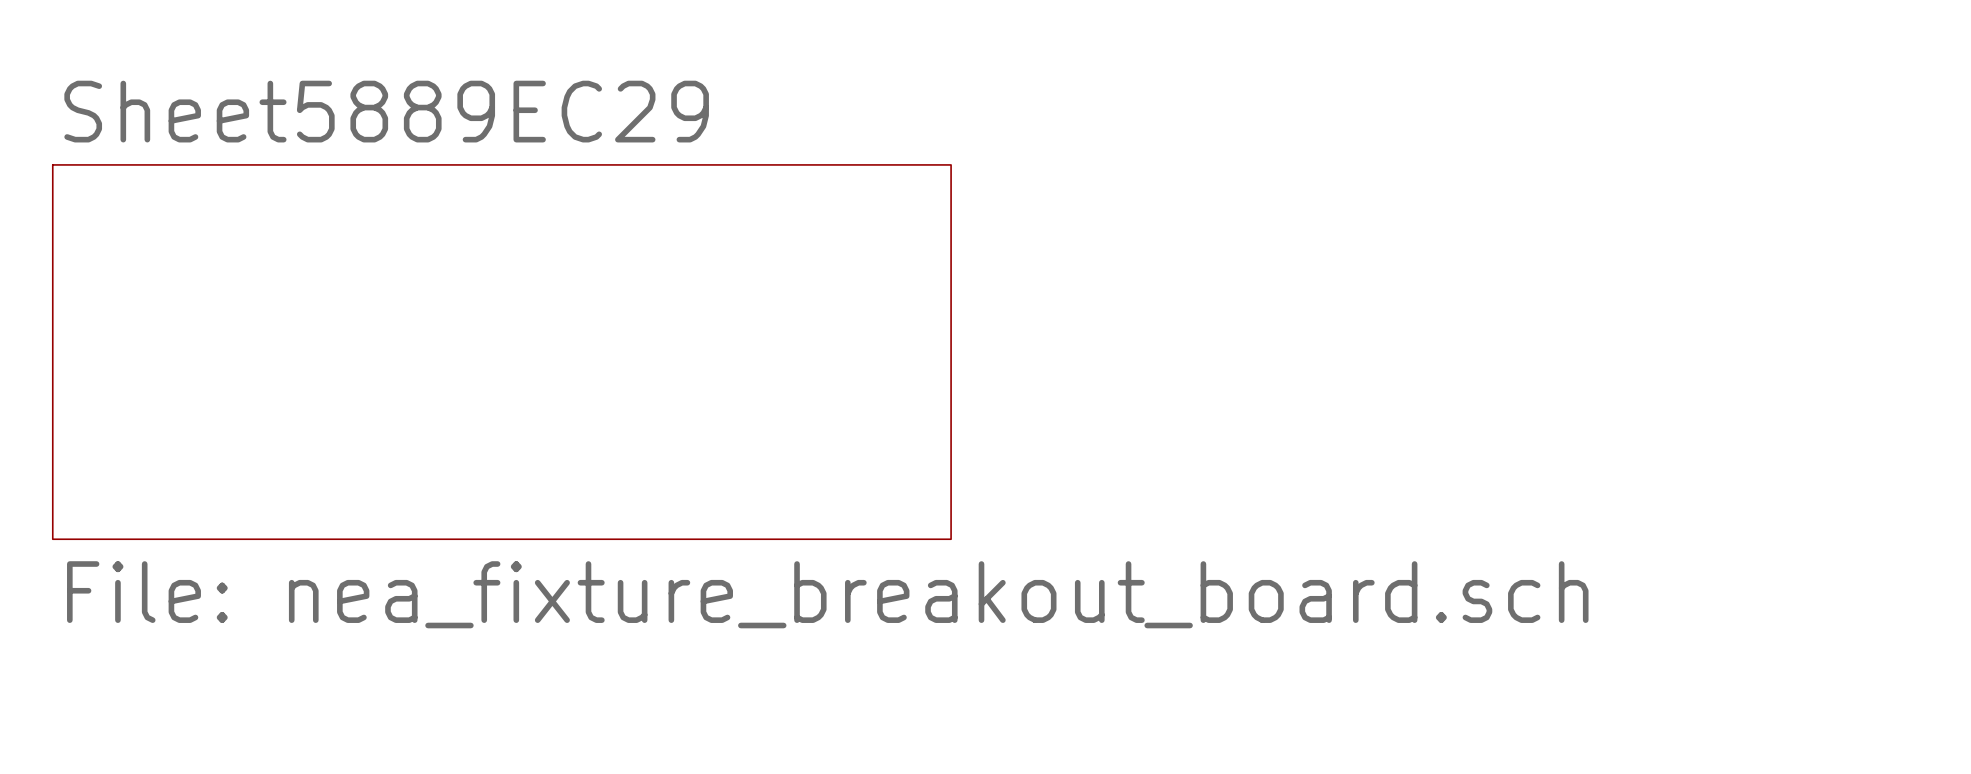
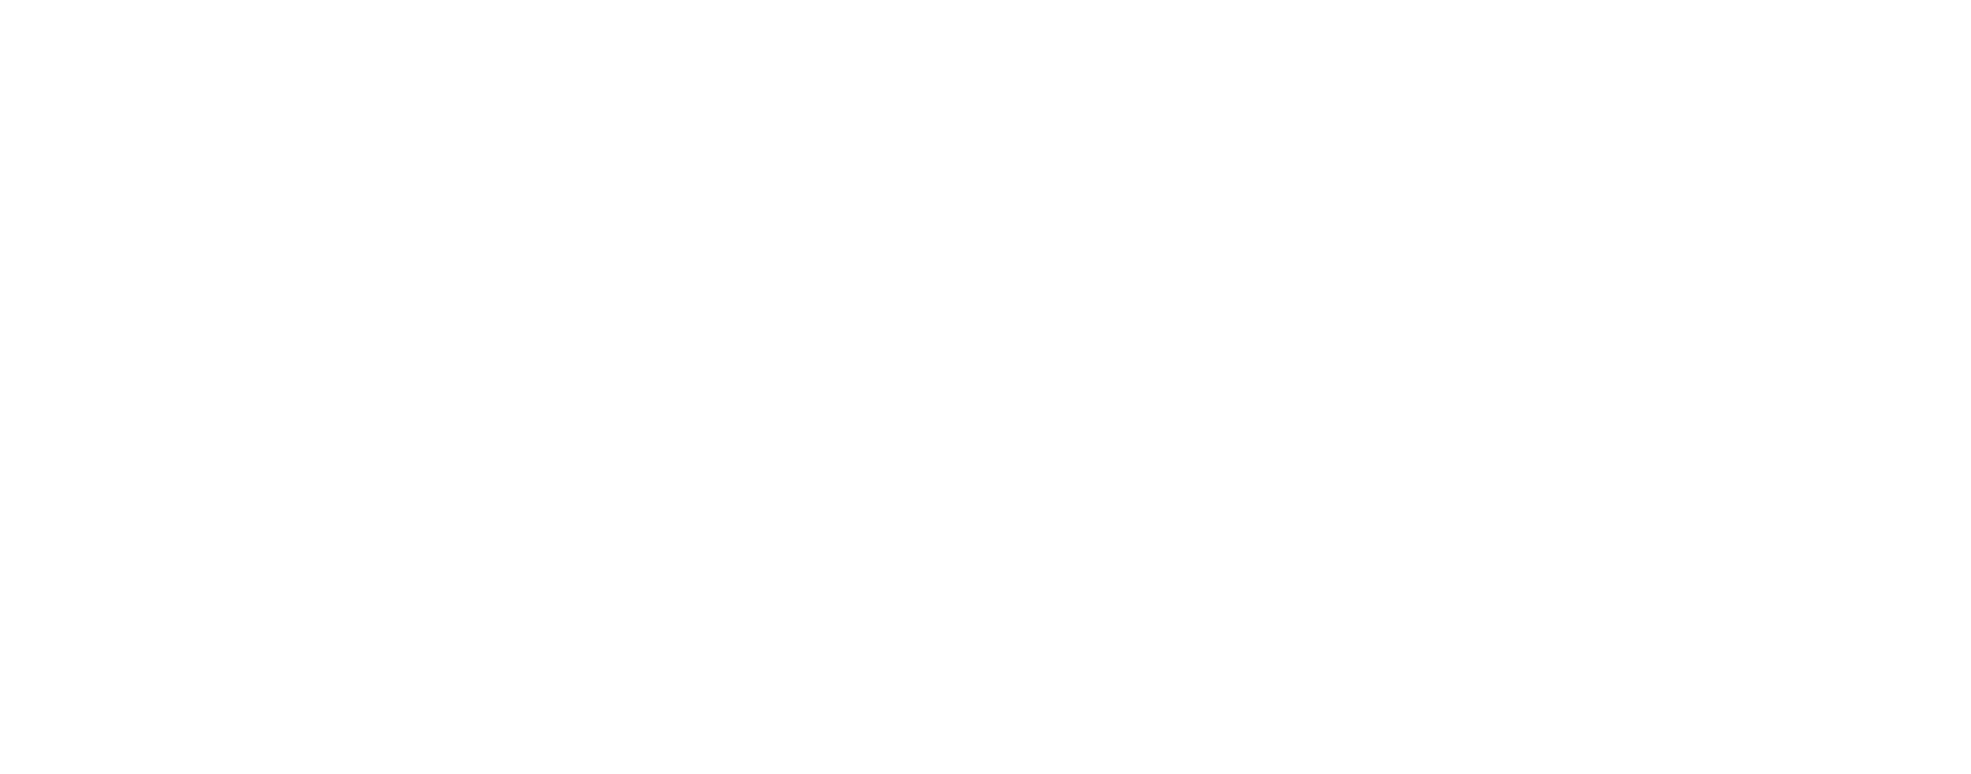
sheet Sheet5889EC29: File: nea_fixture_breakout_board.sch (501, 352) -> none

